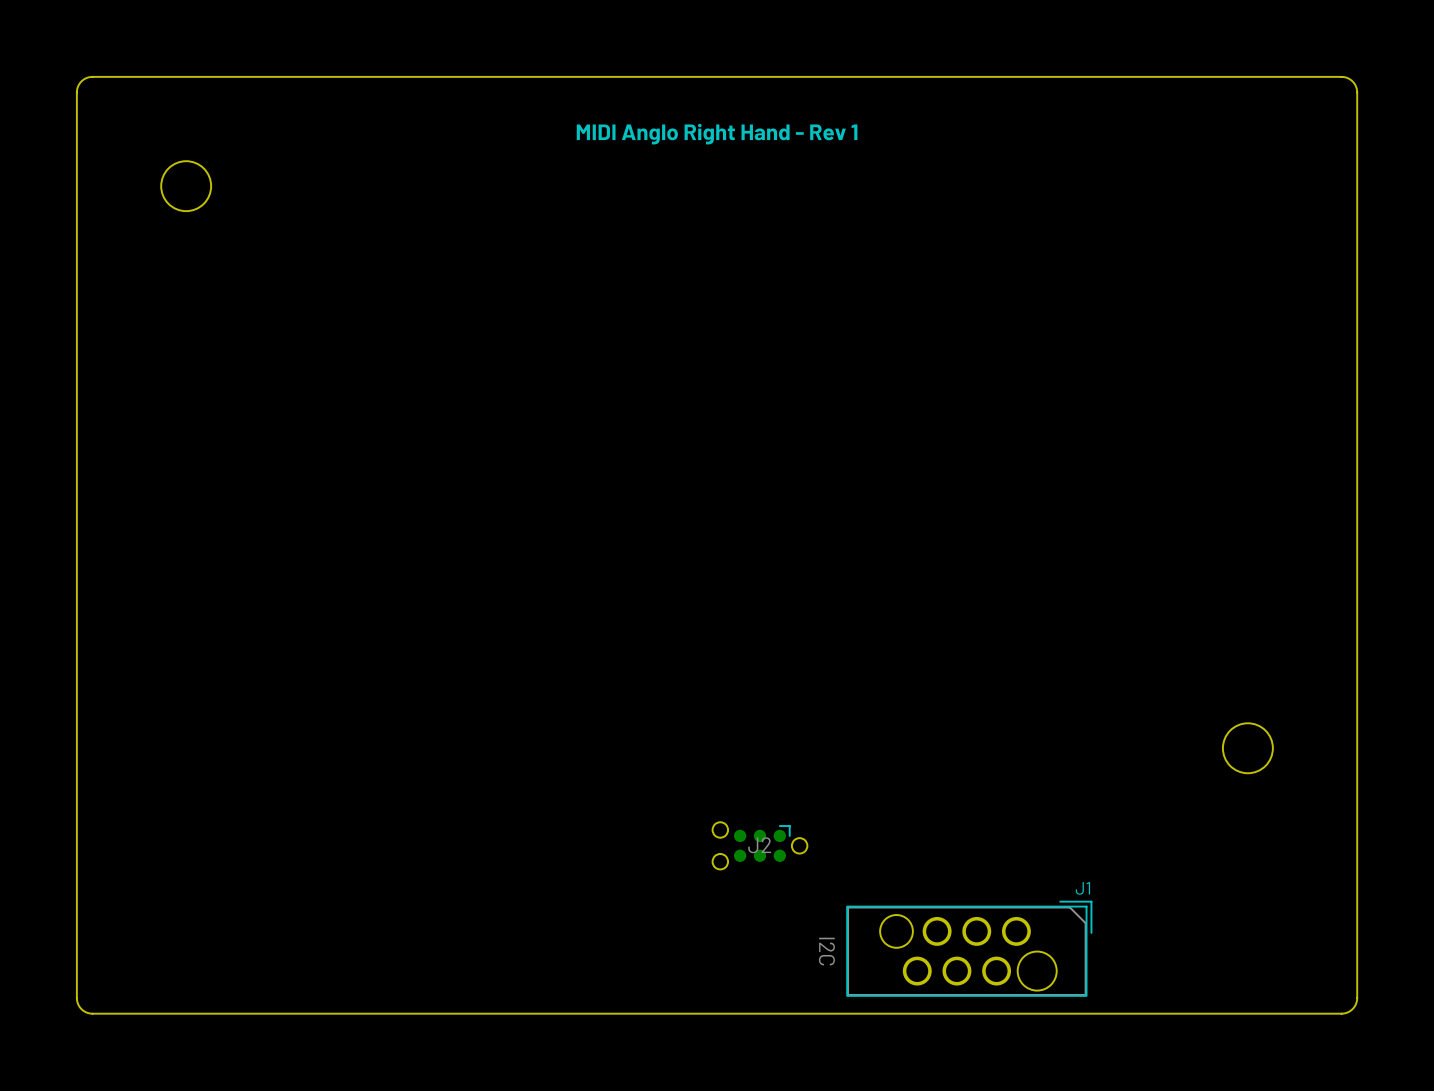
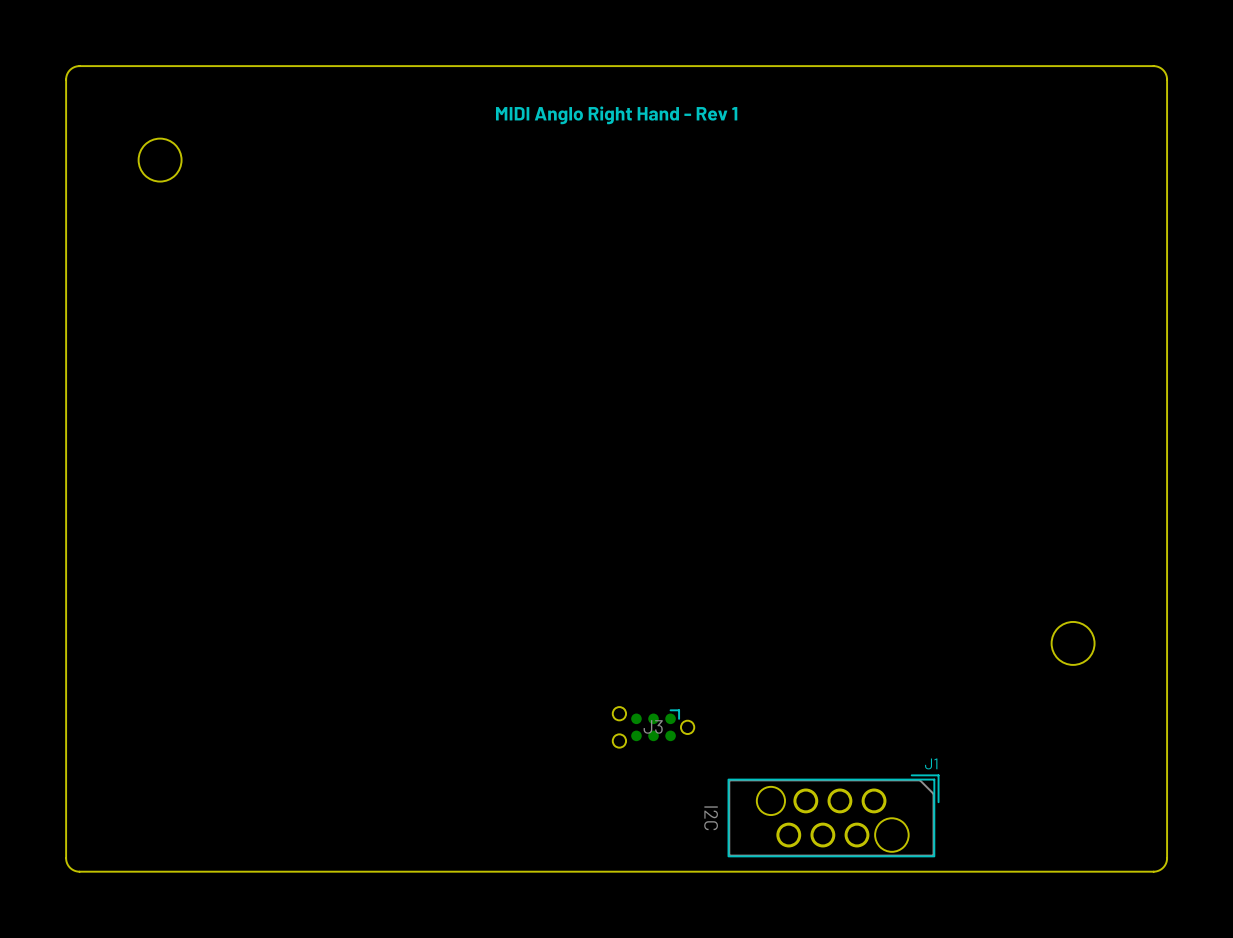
J2 name: J2 (759, 845) -> J3 (653, 726)

